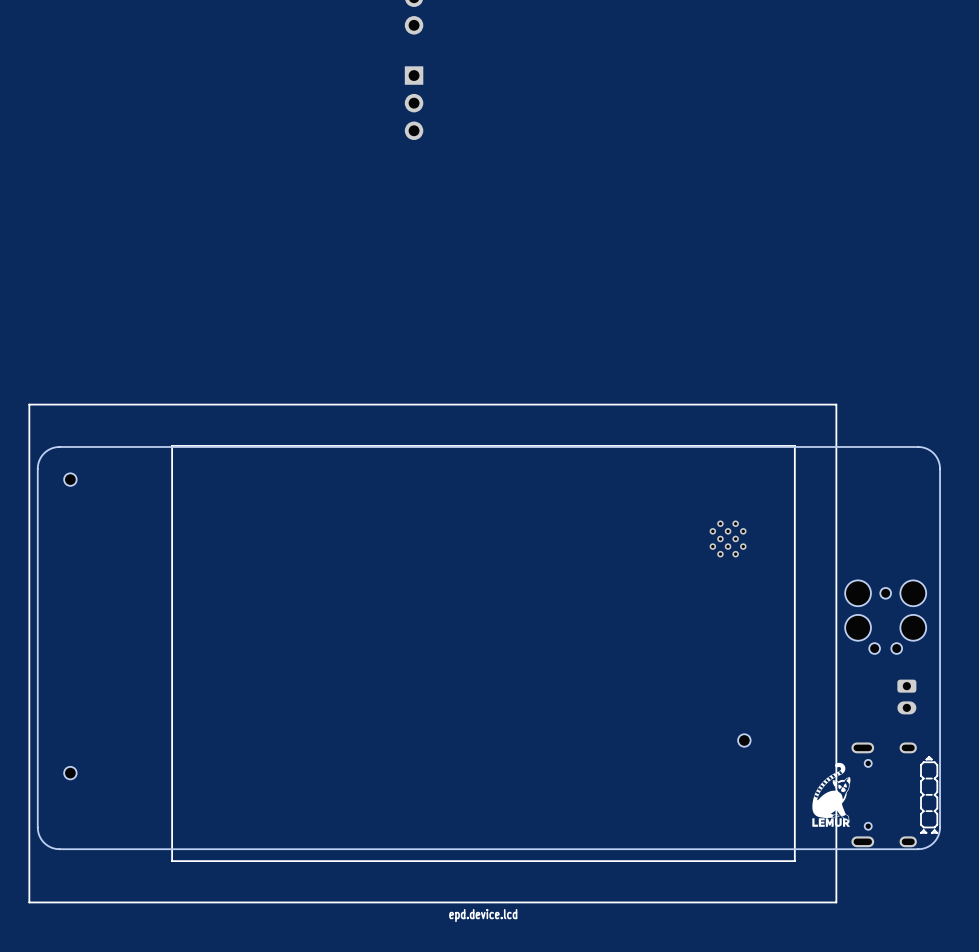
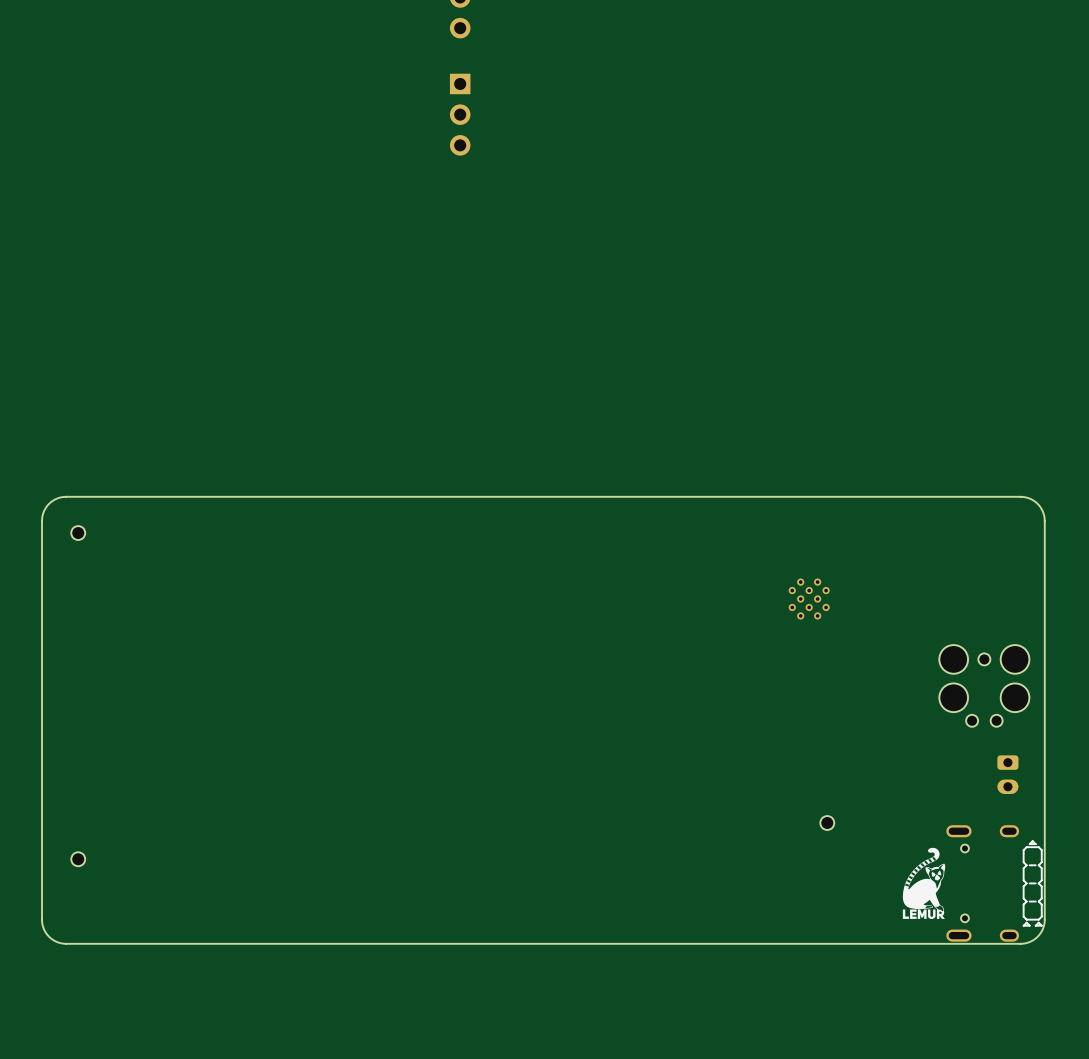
epd.device.lcd: (432, 653) -> none

